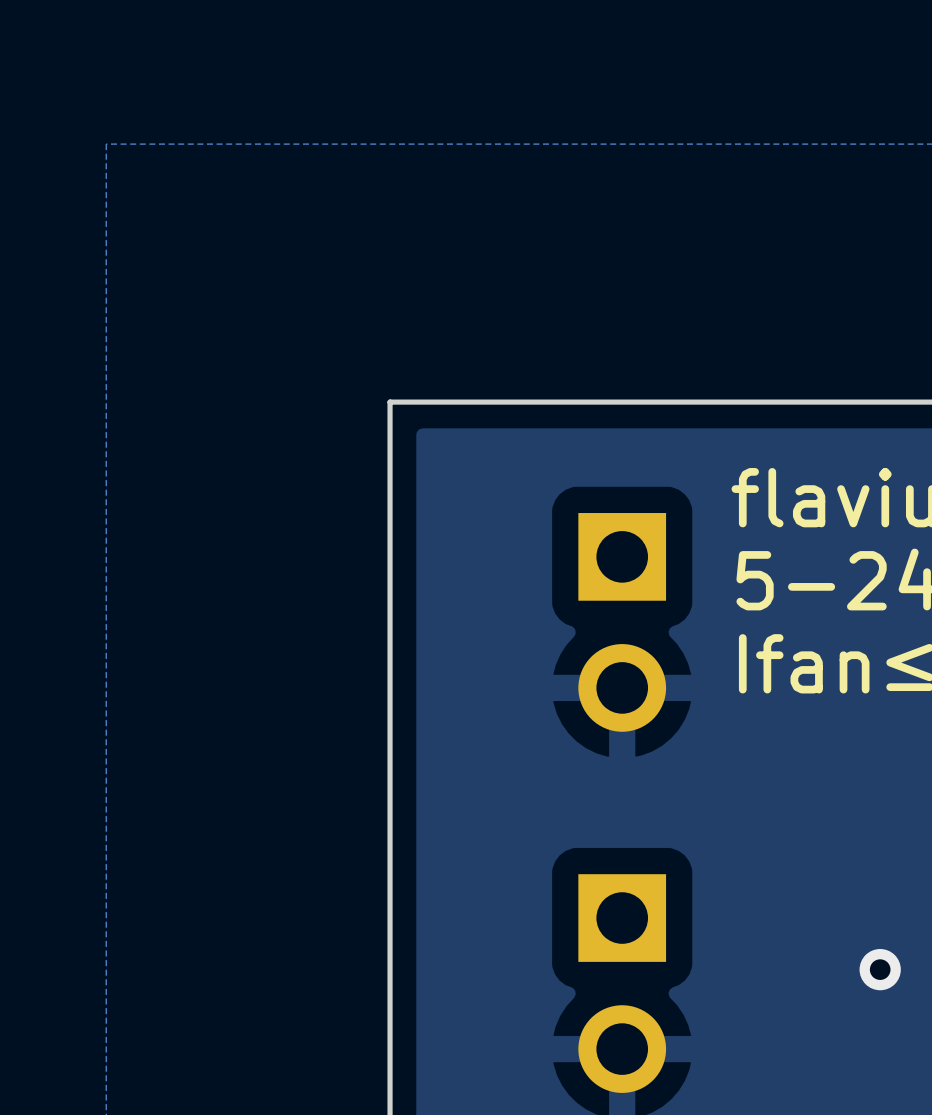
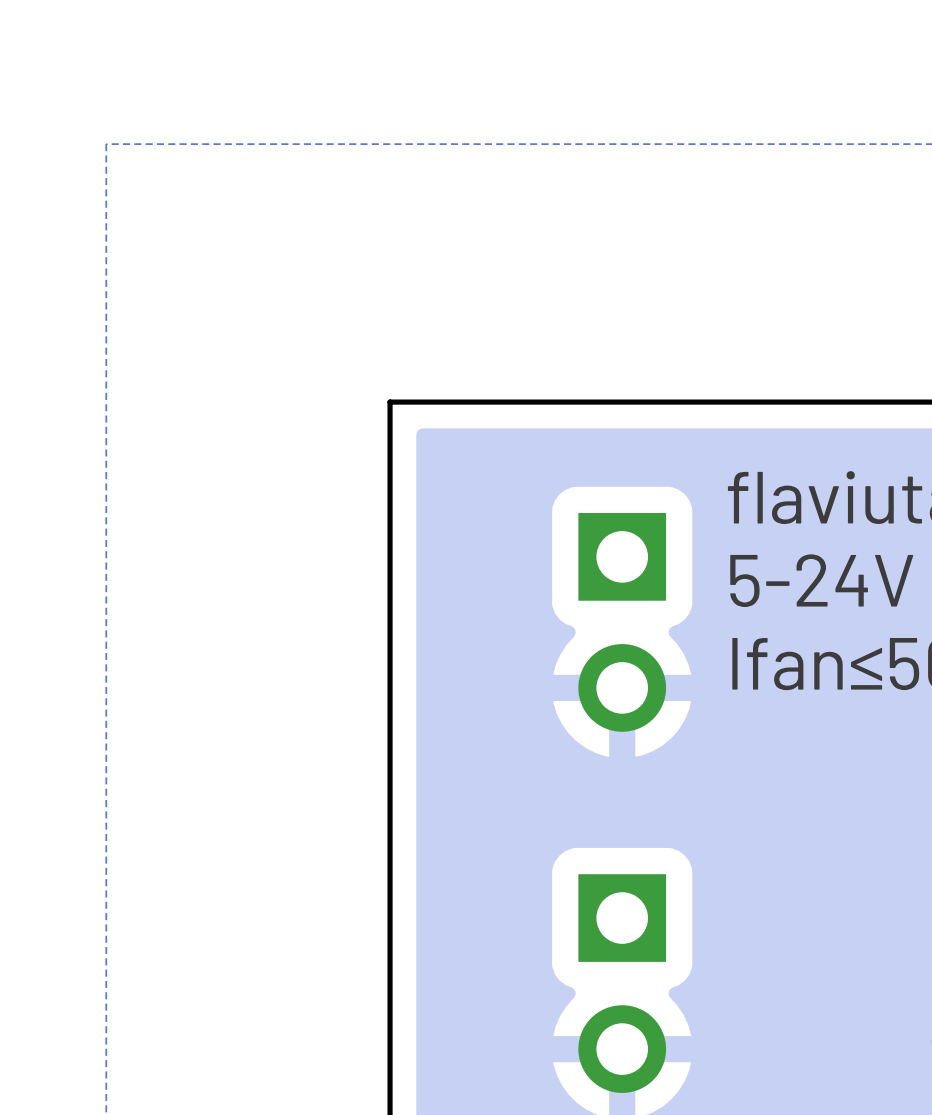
via: (880, 969) -> none

